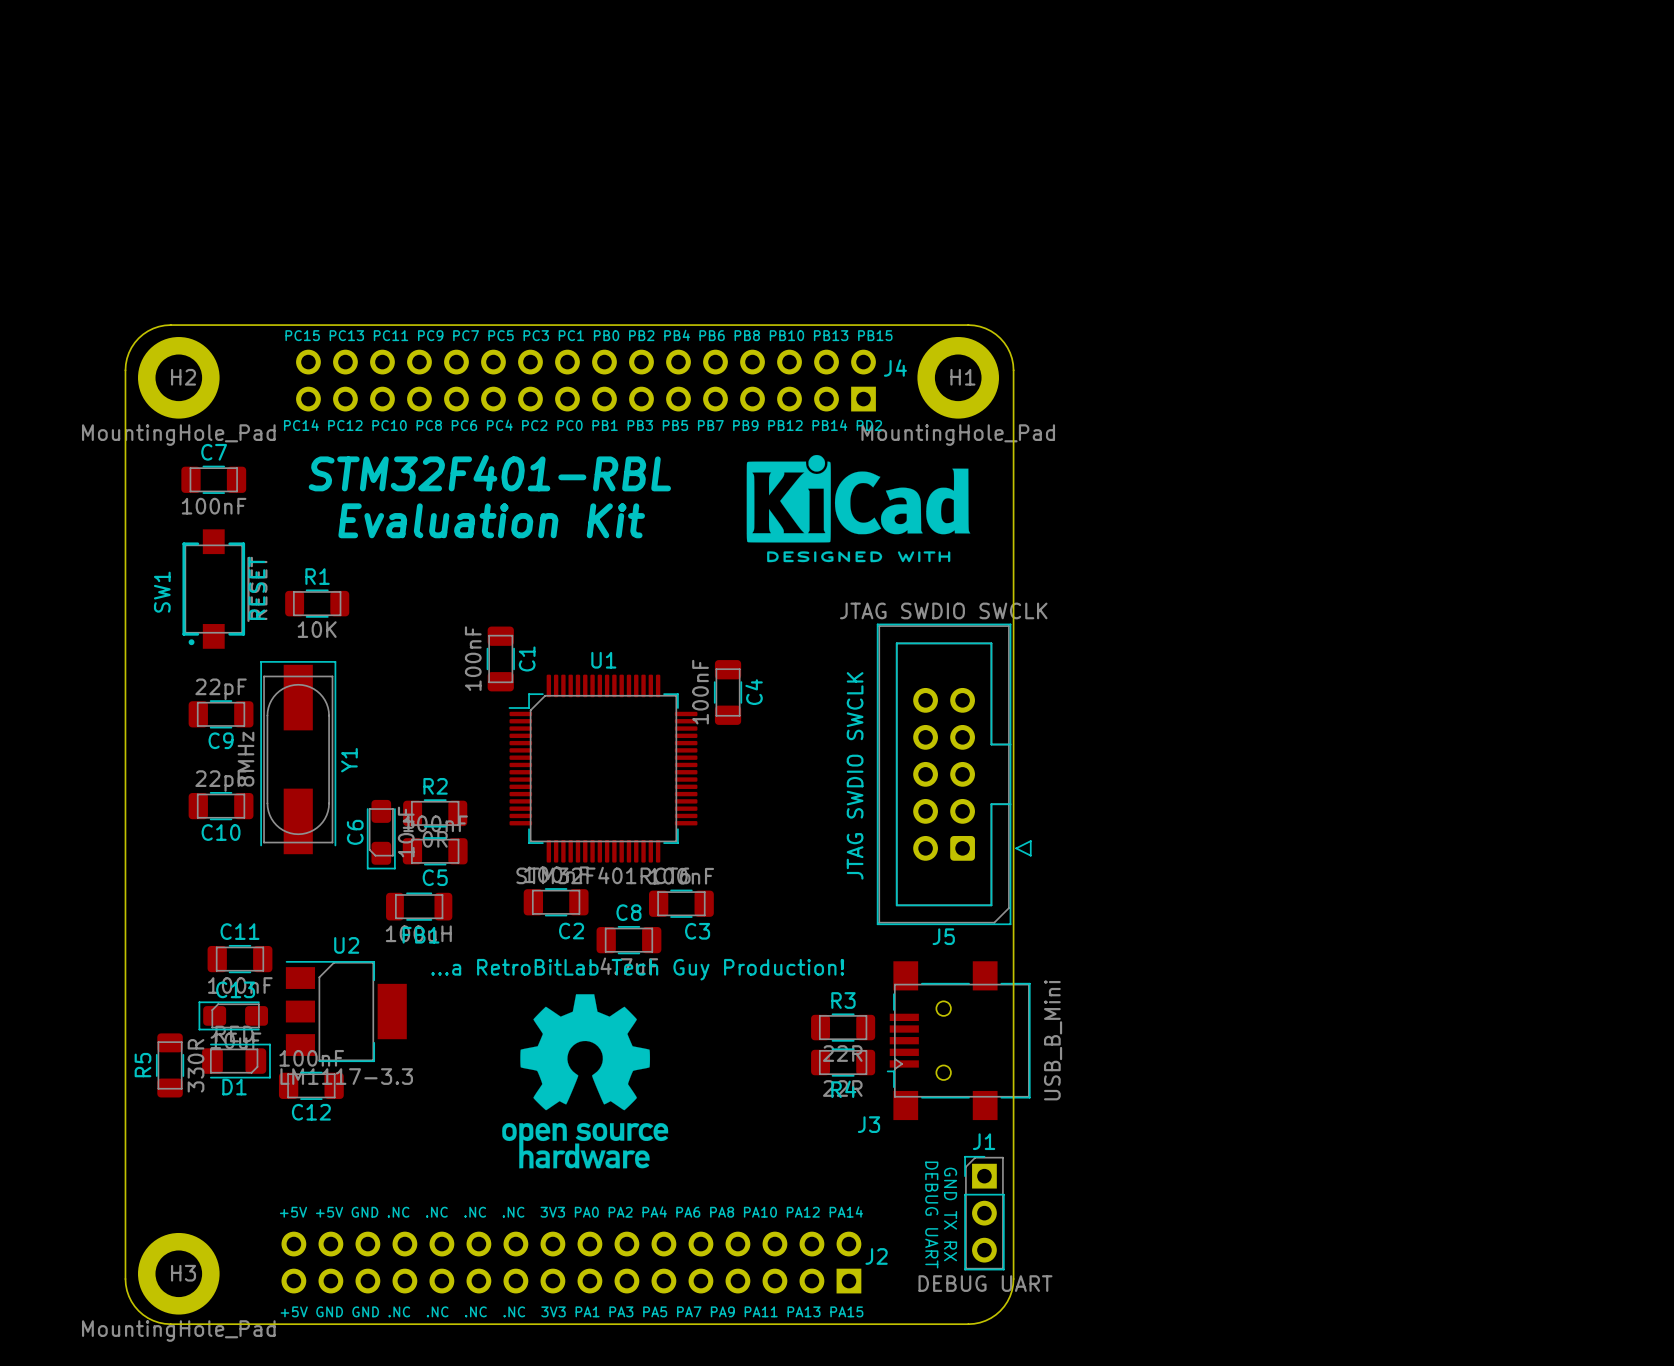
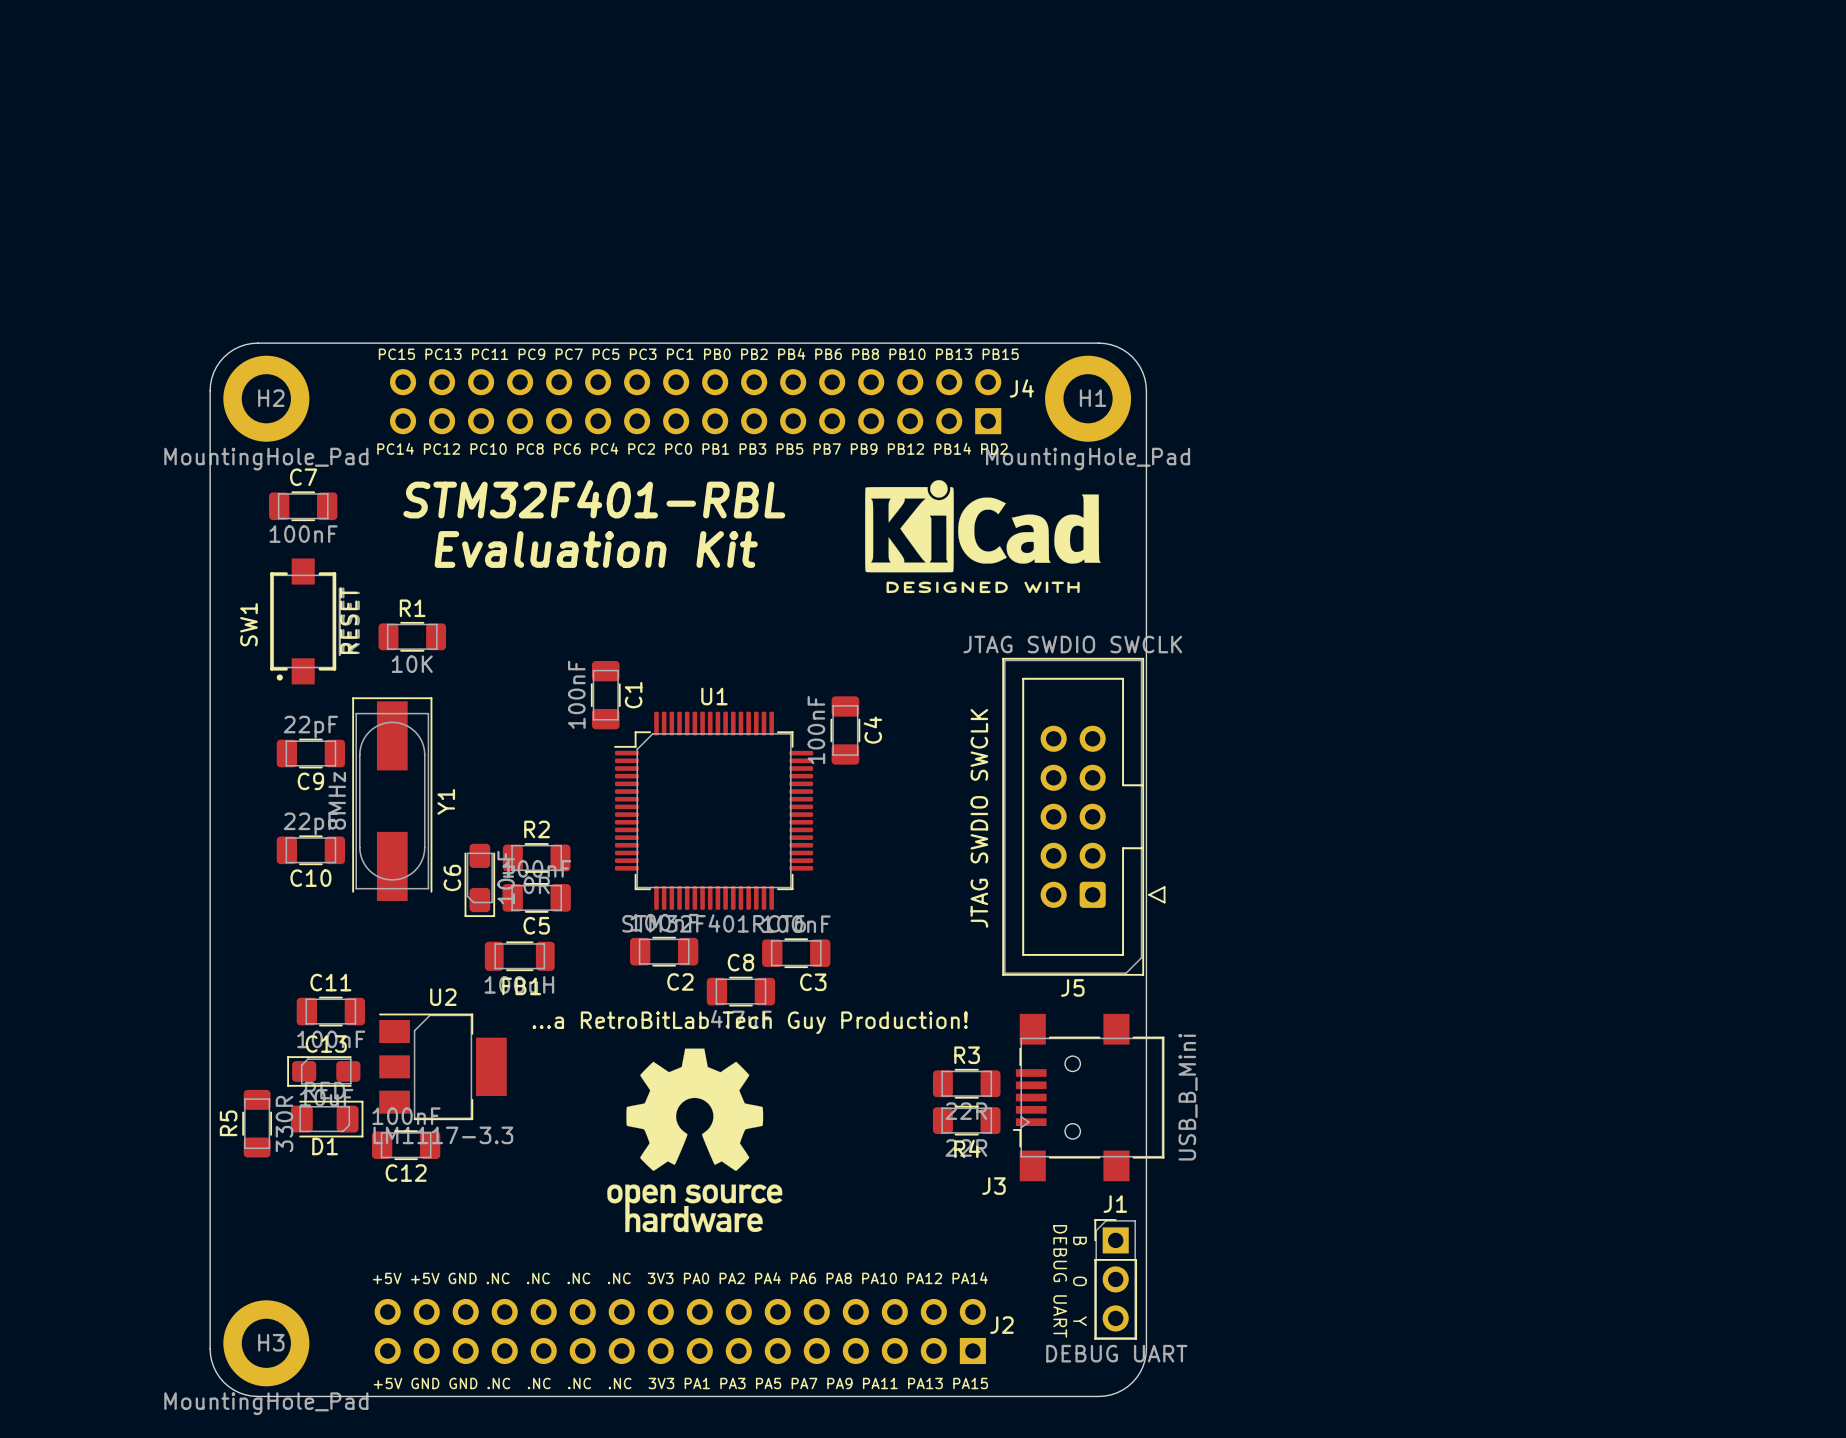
text: GND TX RX (950, 1214) -> B O Y (1079, 1281)

